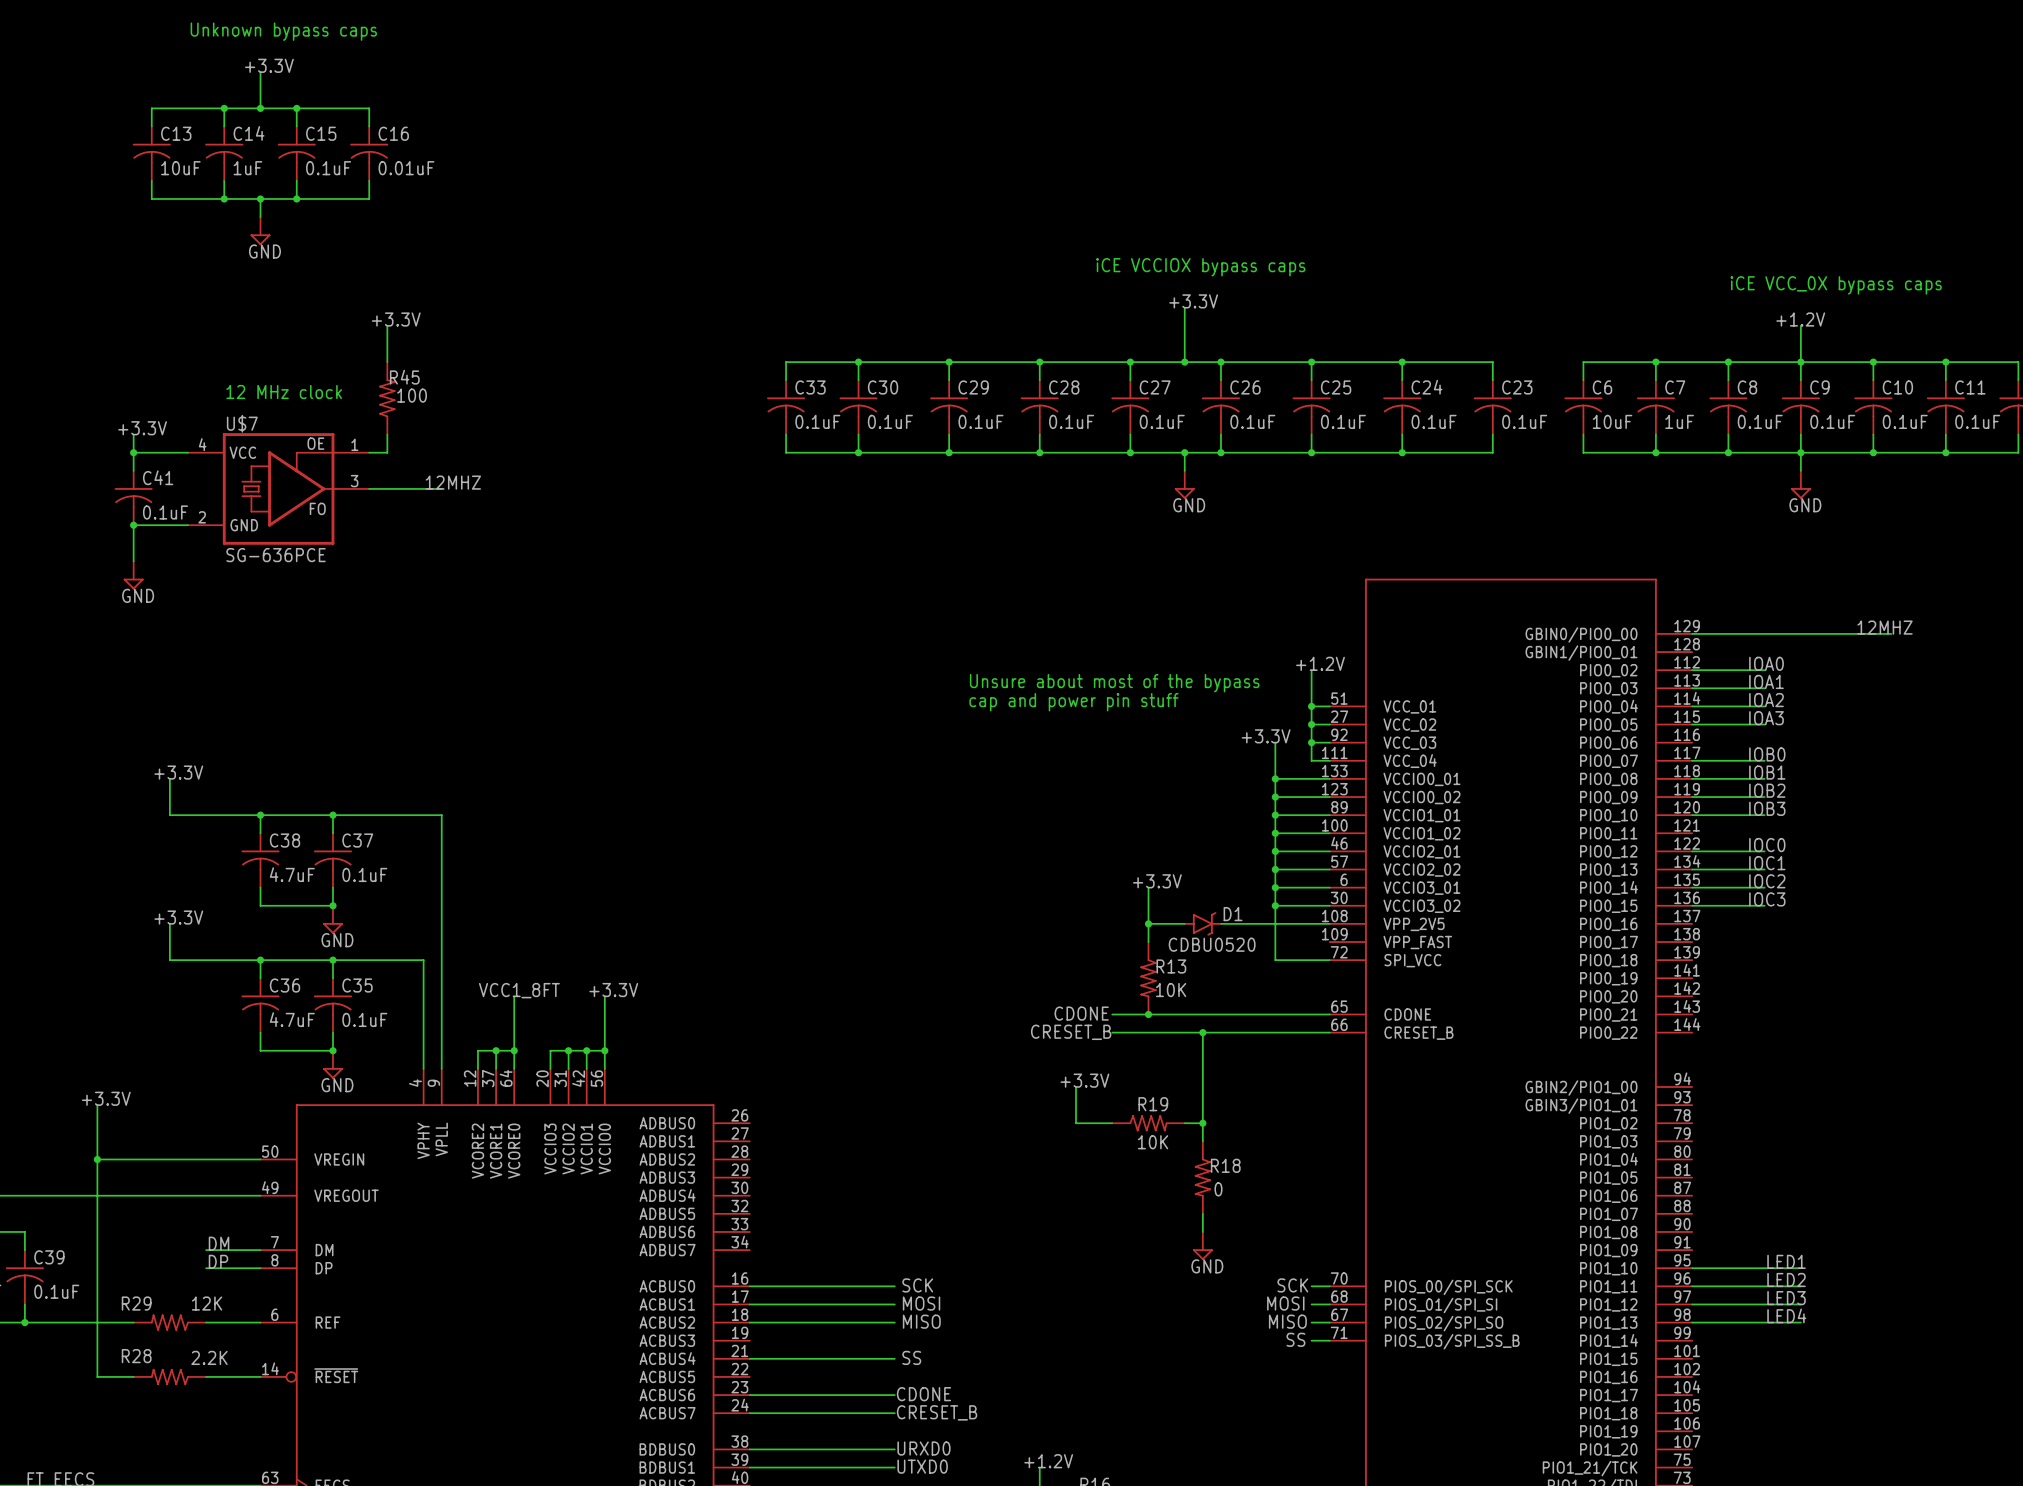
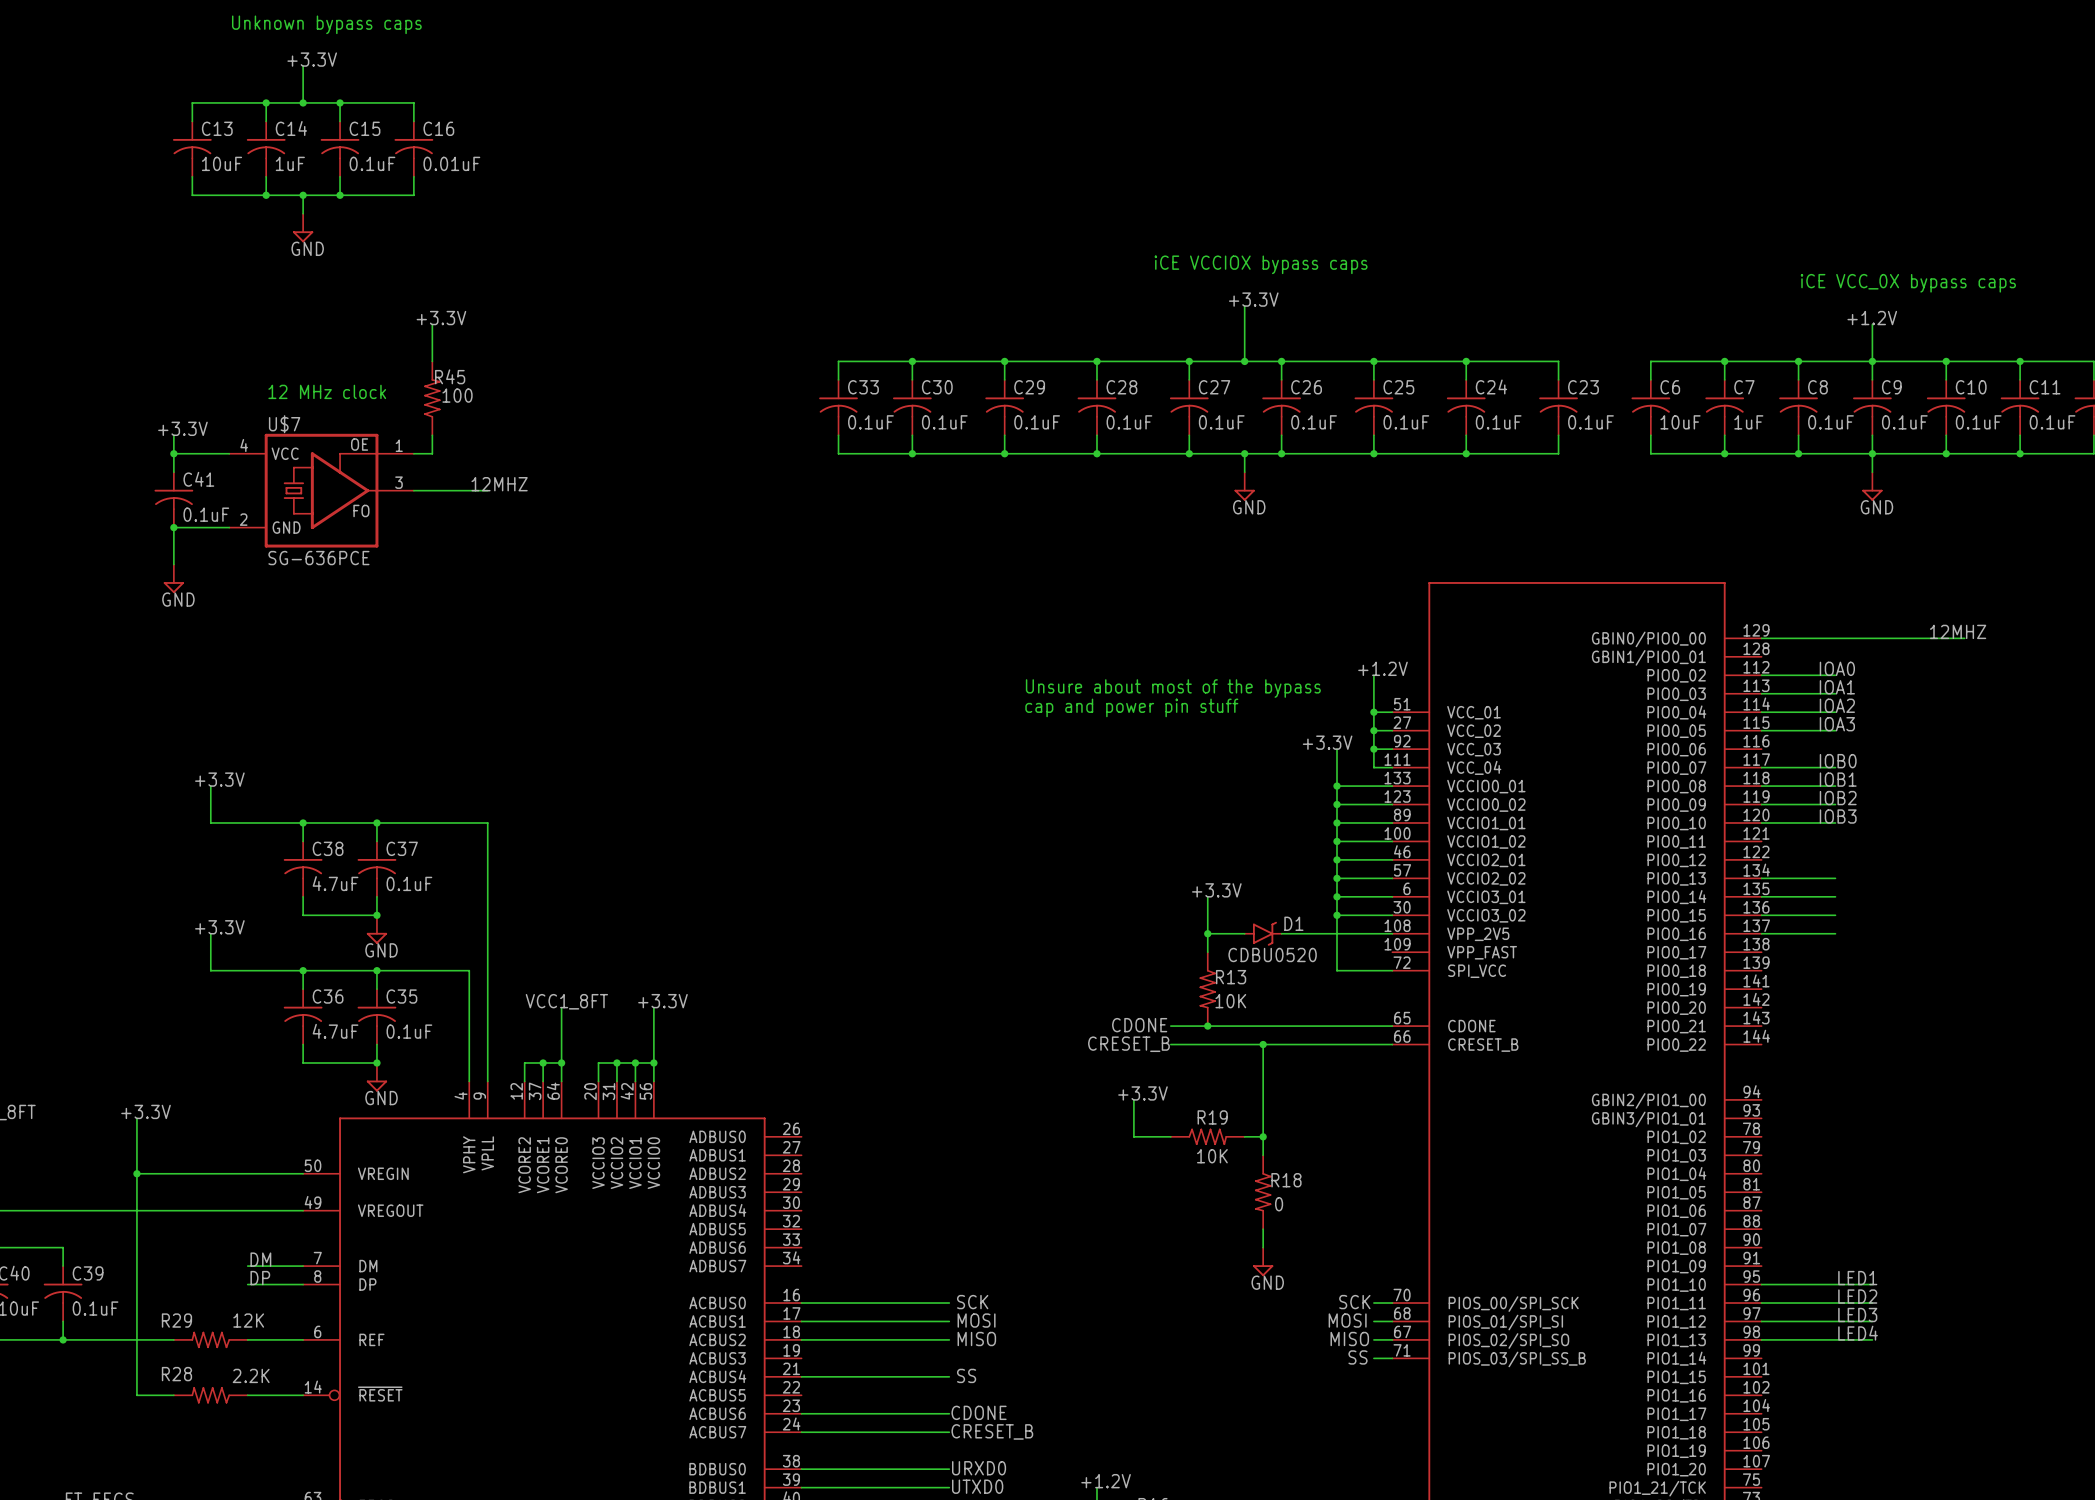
label: IOC0 (1767, 845) -> none
wire: (1692, 851) (1764, 851) -> (1761, 933) (1835, 933)
label: IOC1 (1767, 863) -> none
label: IOC2 (1767, 881) -> none
label: IOC3 (1767, 899) -> none

